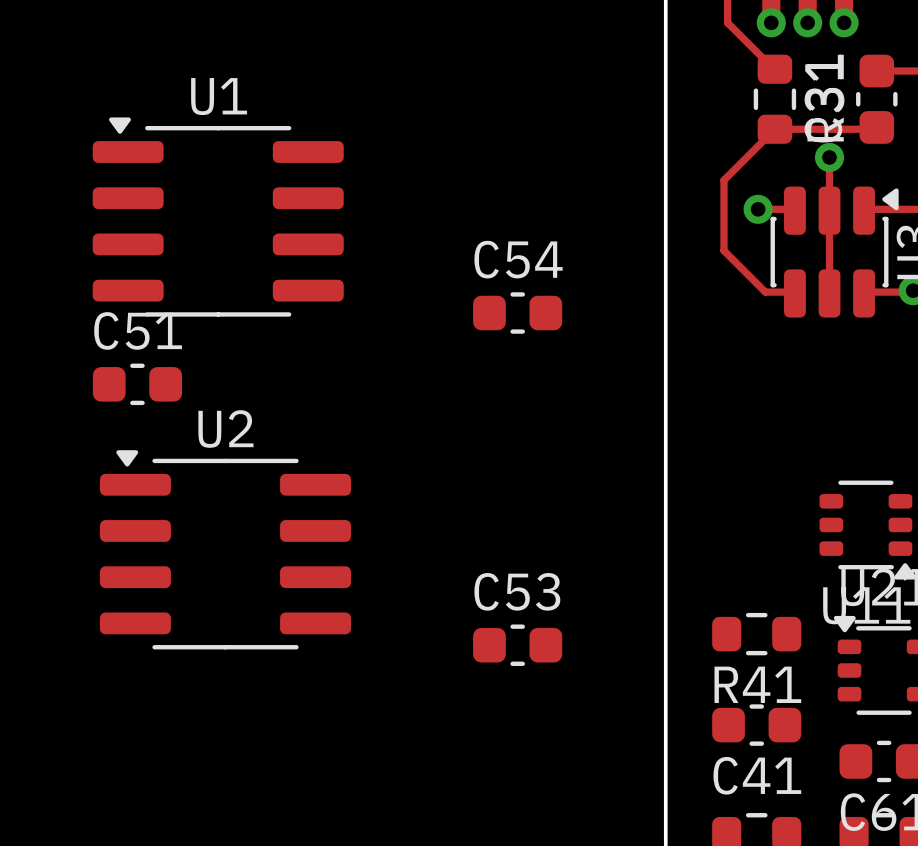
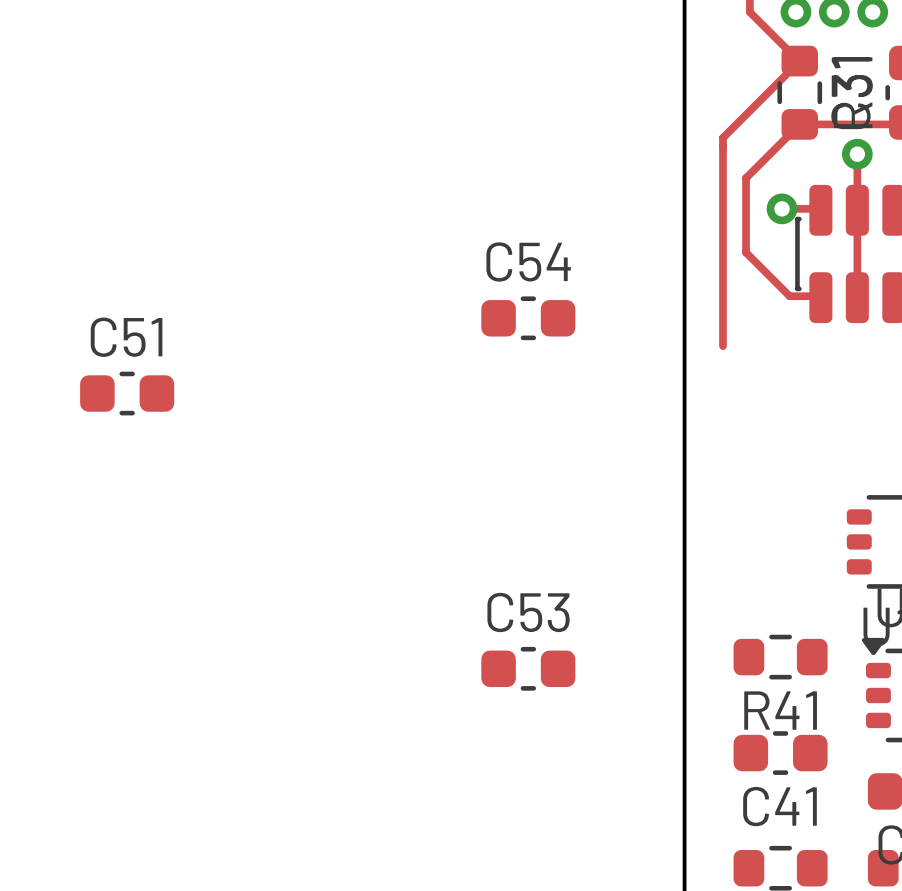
track: none -> (799, 61) (722, 137) (722, 346)
U1: (218, 217) -> none
U2: (225, 549) -> none

